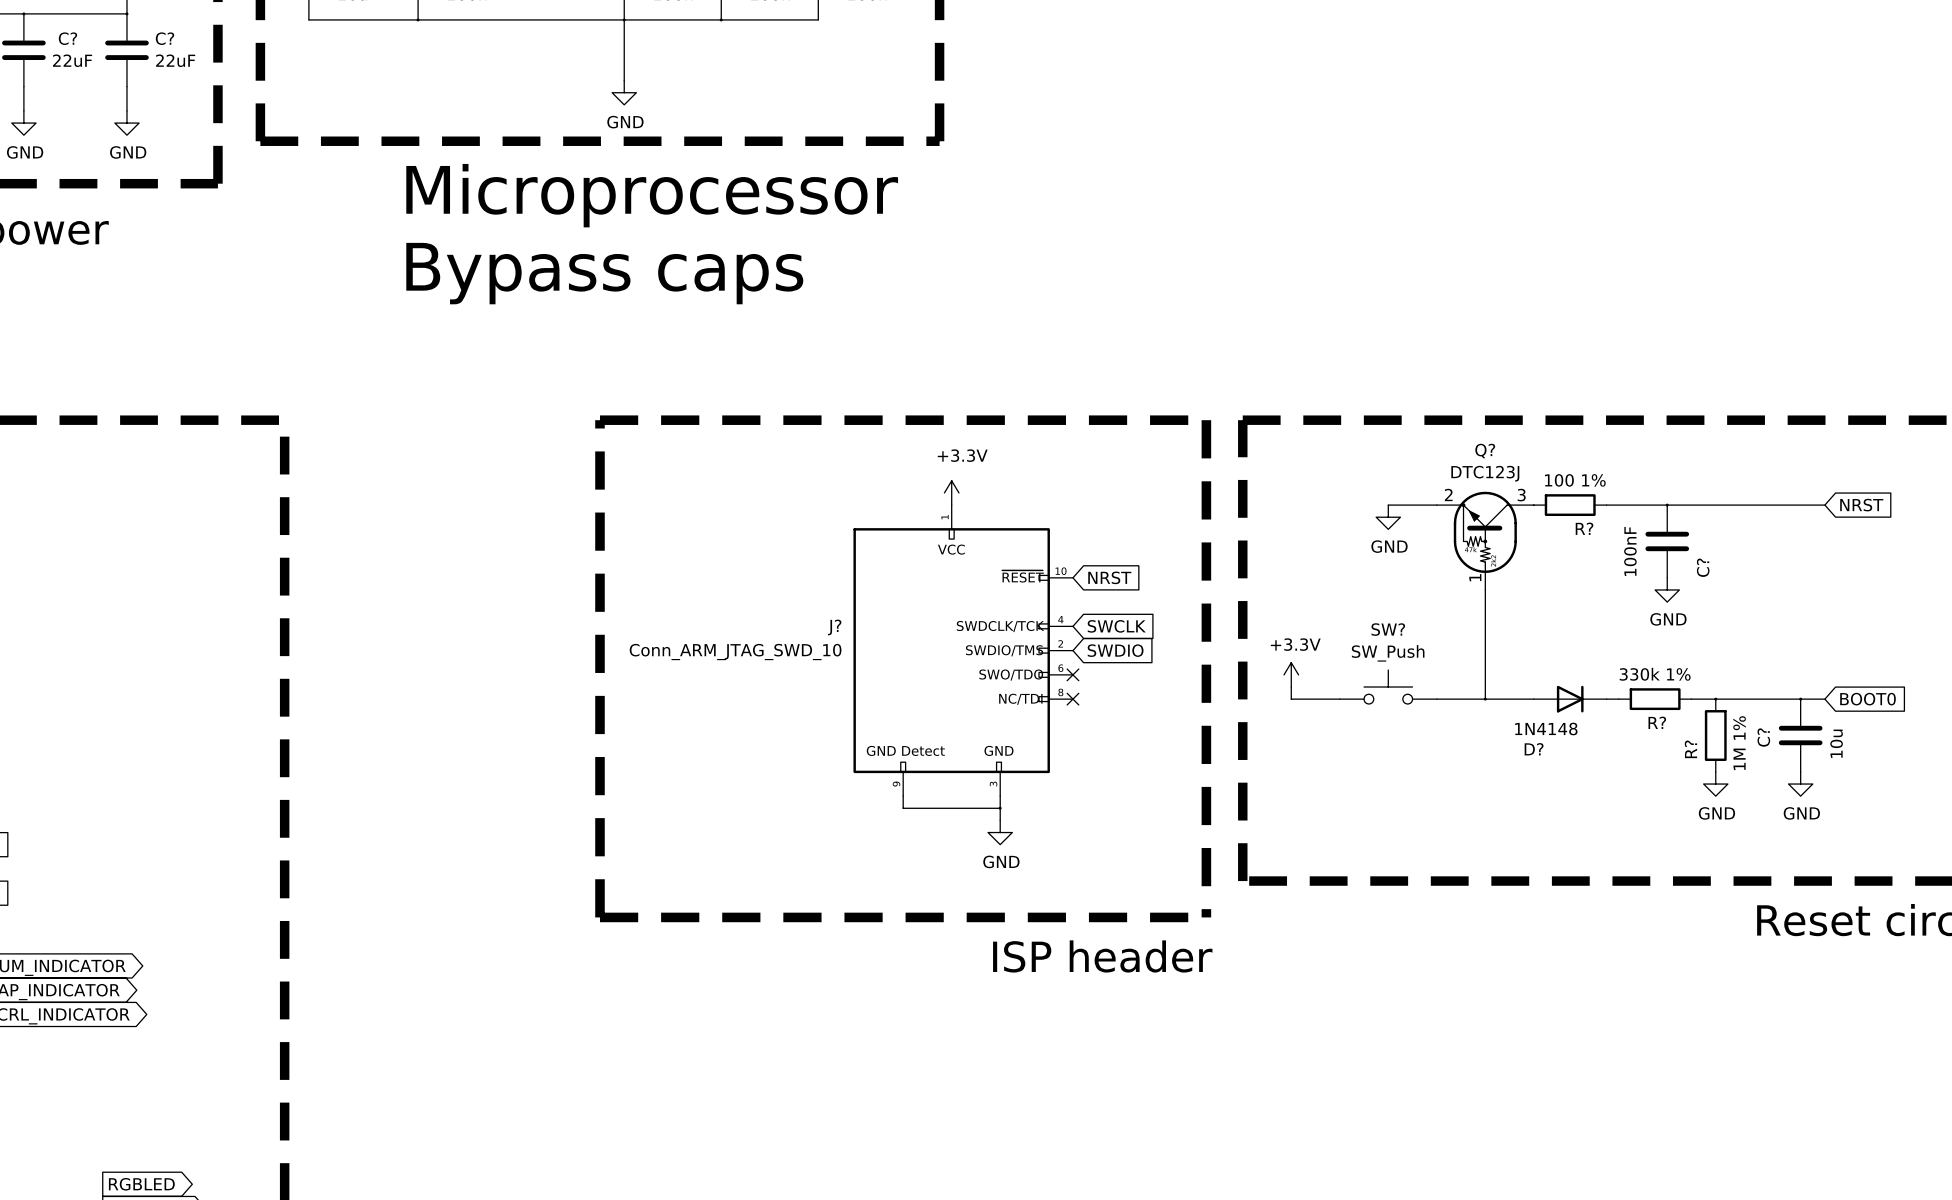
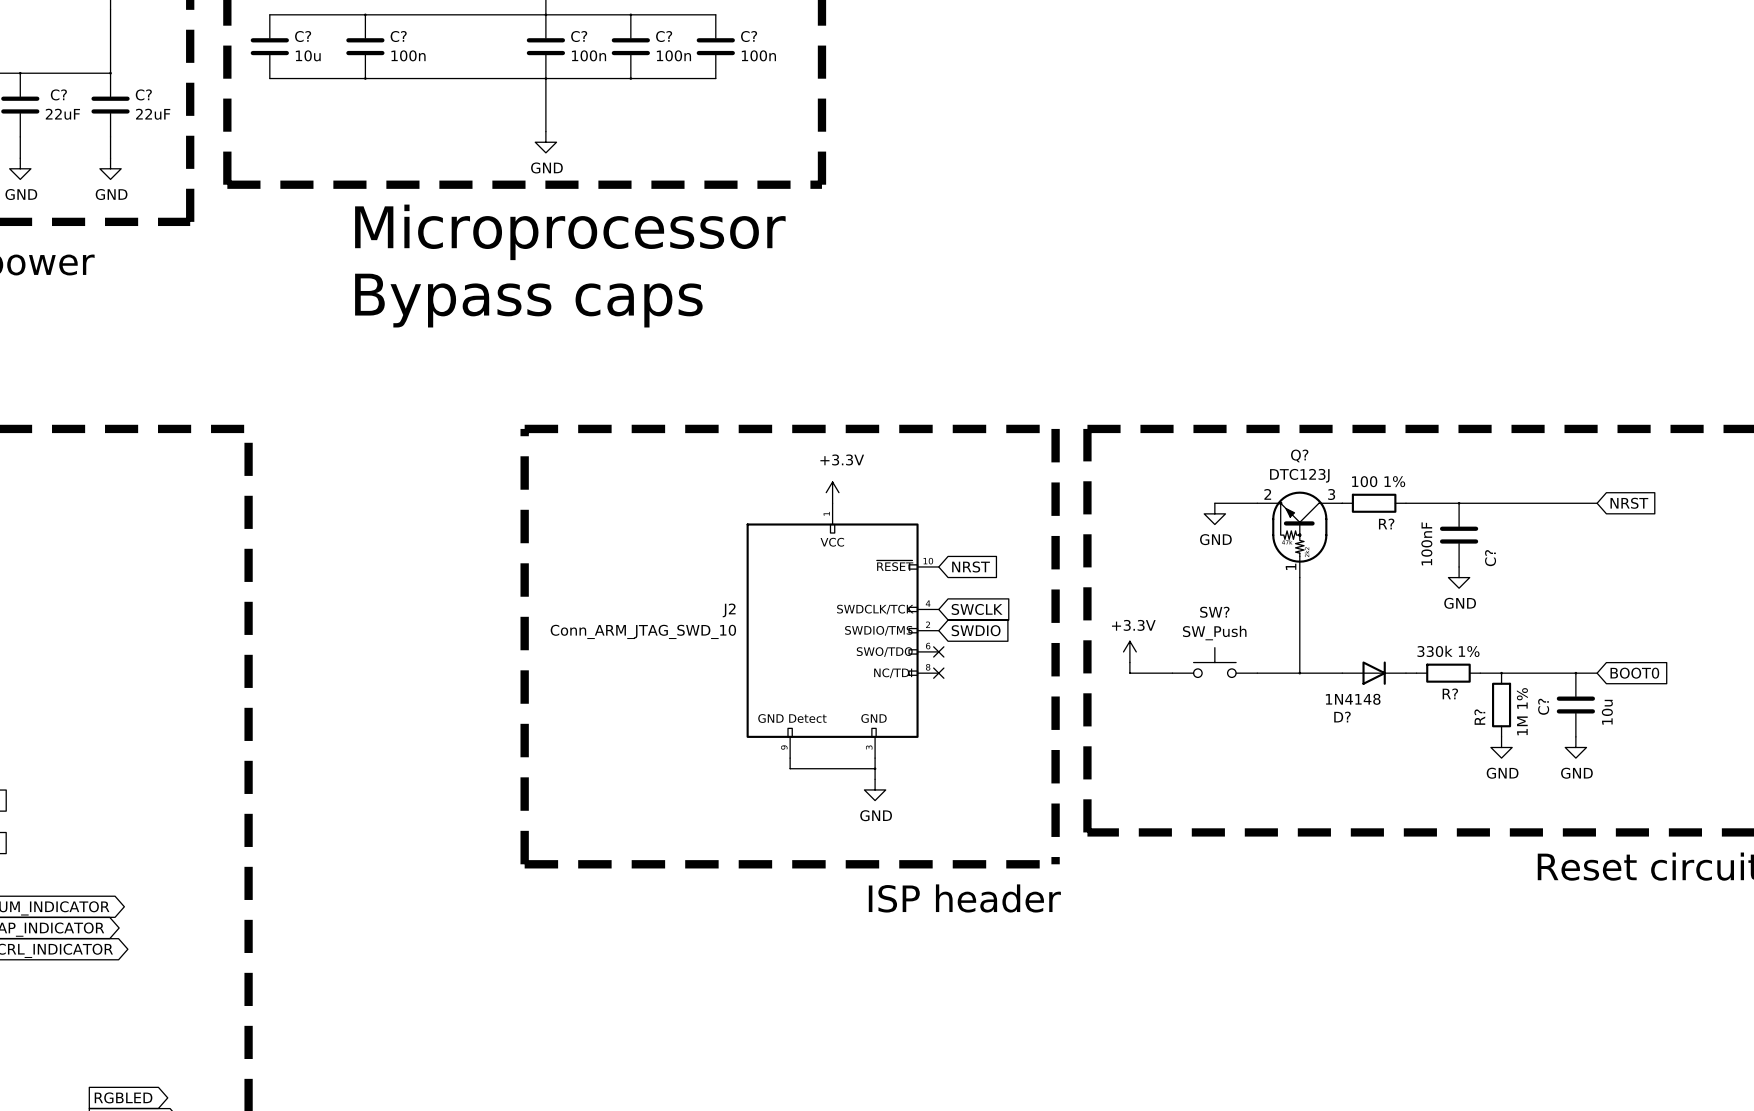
J? name: J? (834, 627) -> J2 (729, 610)

